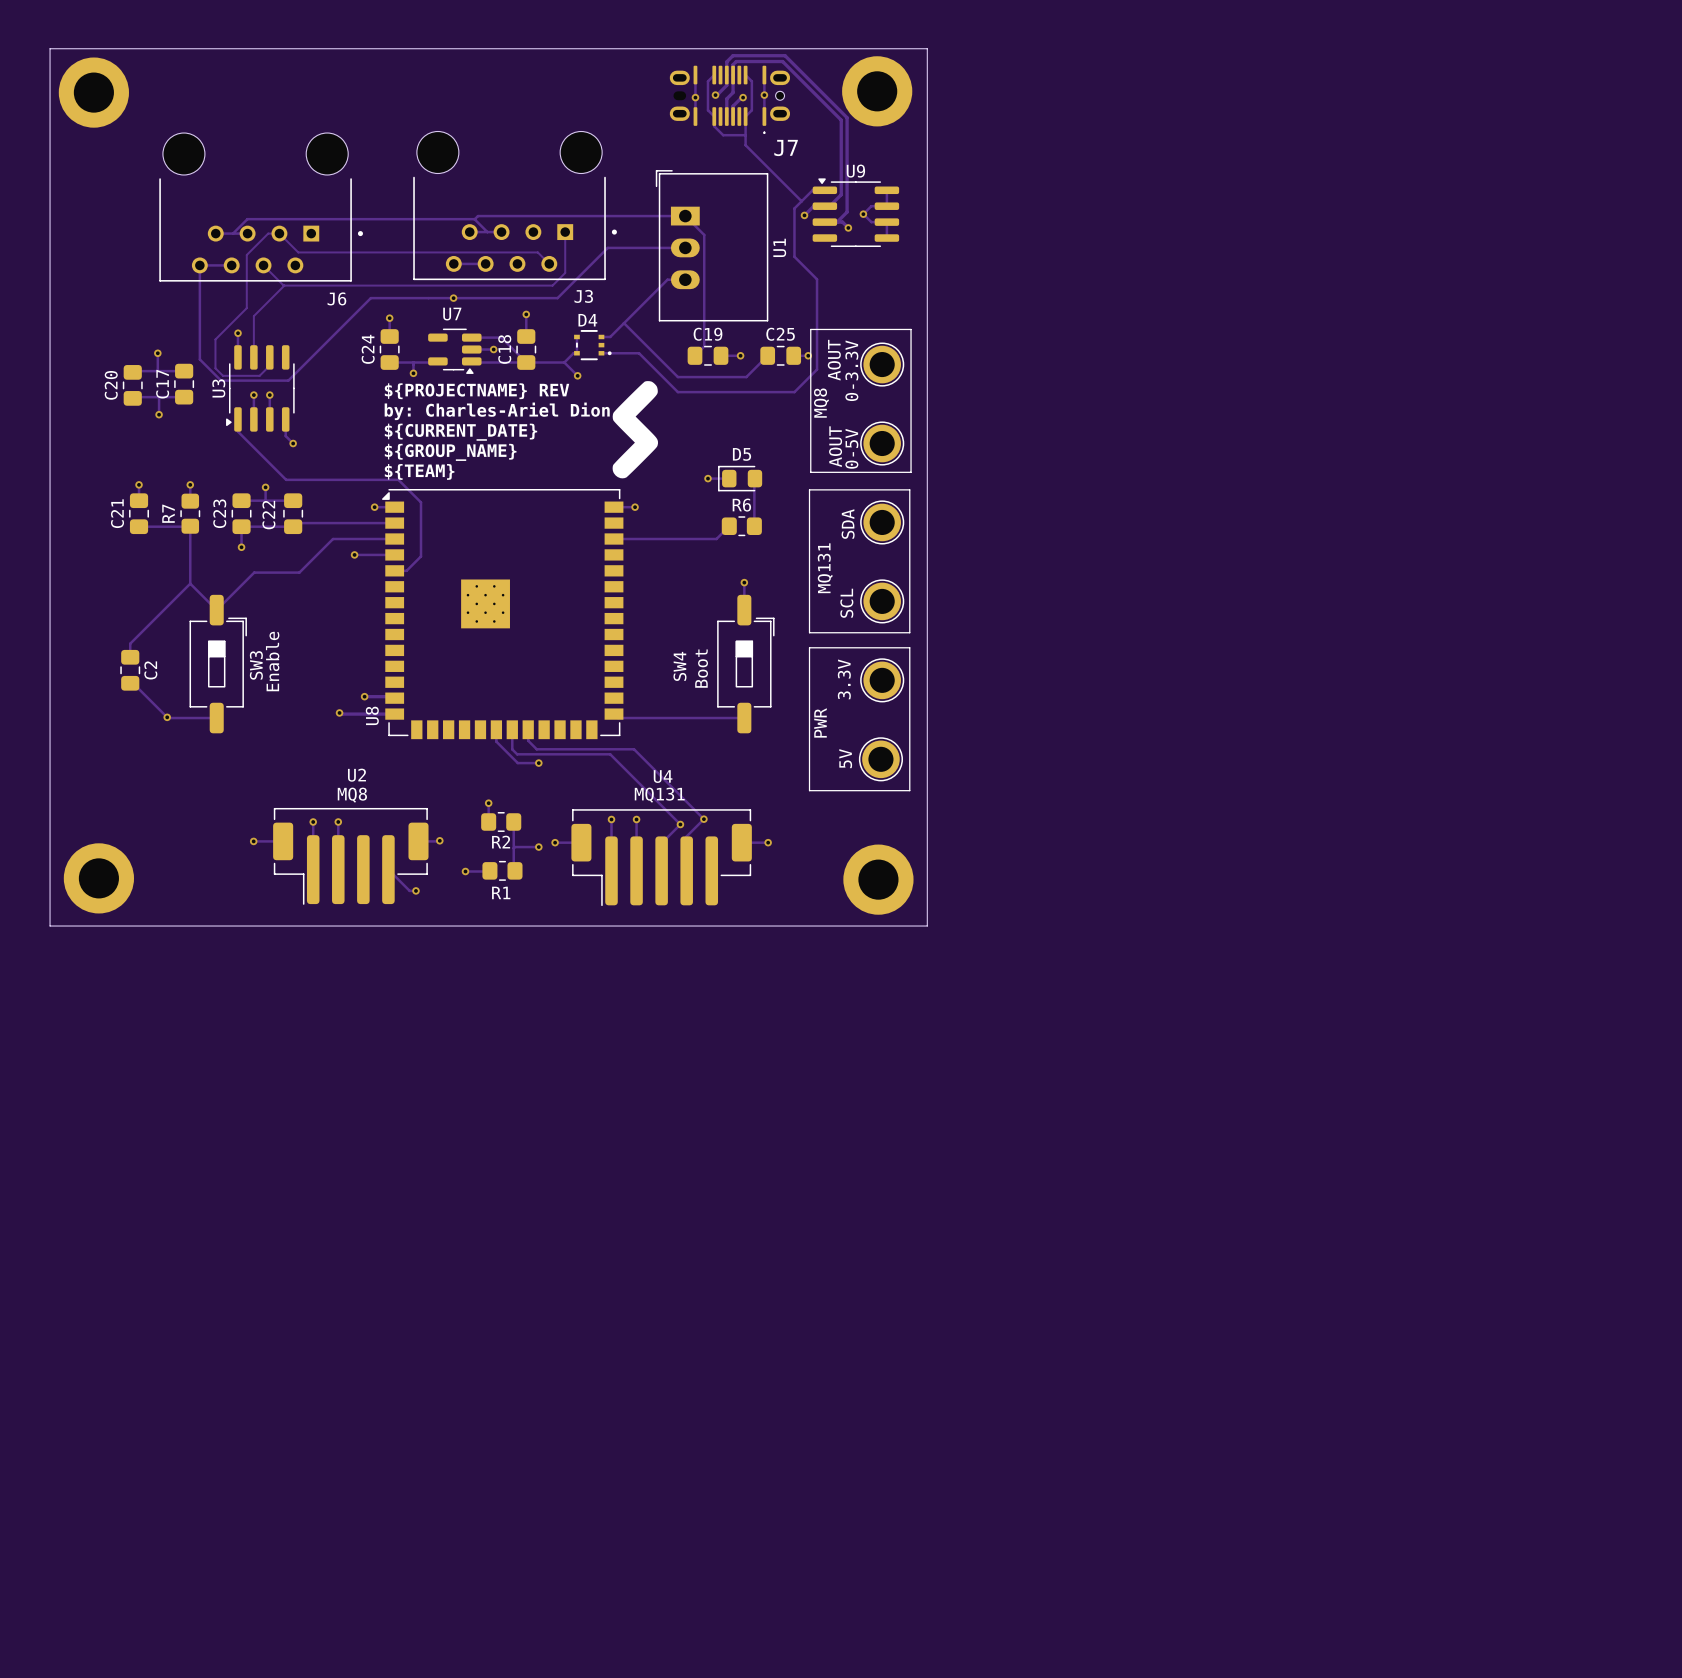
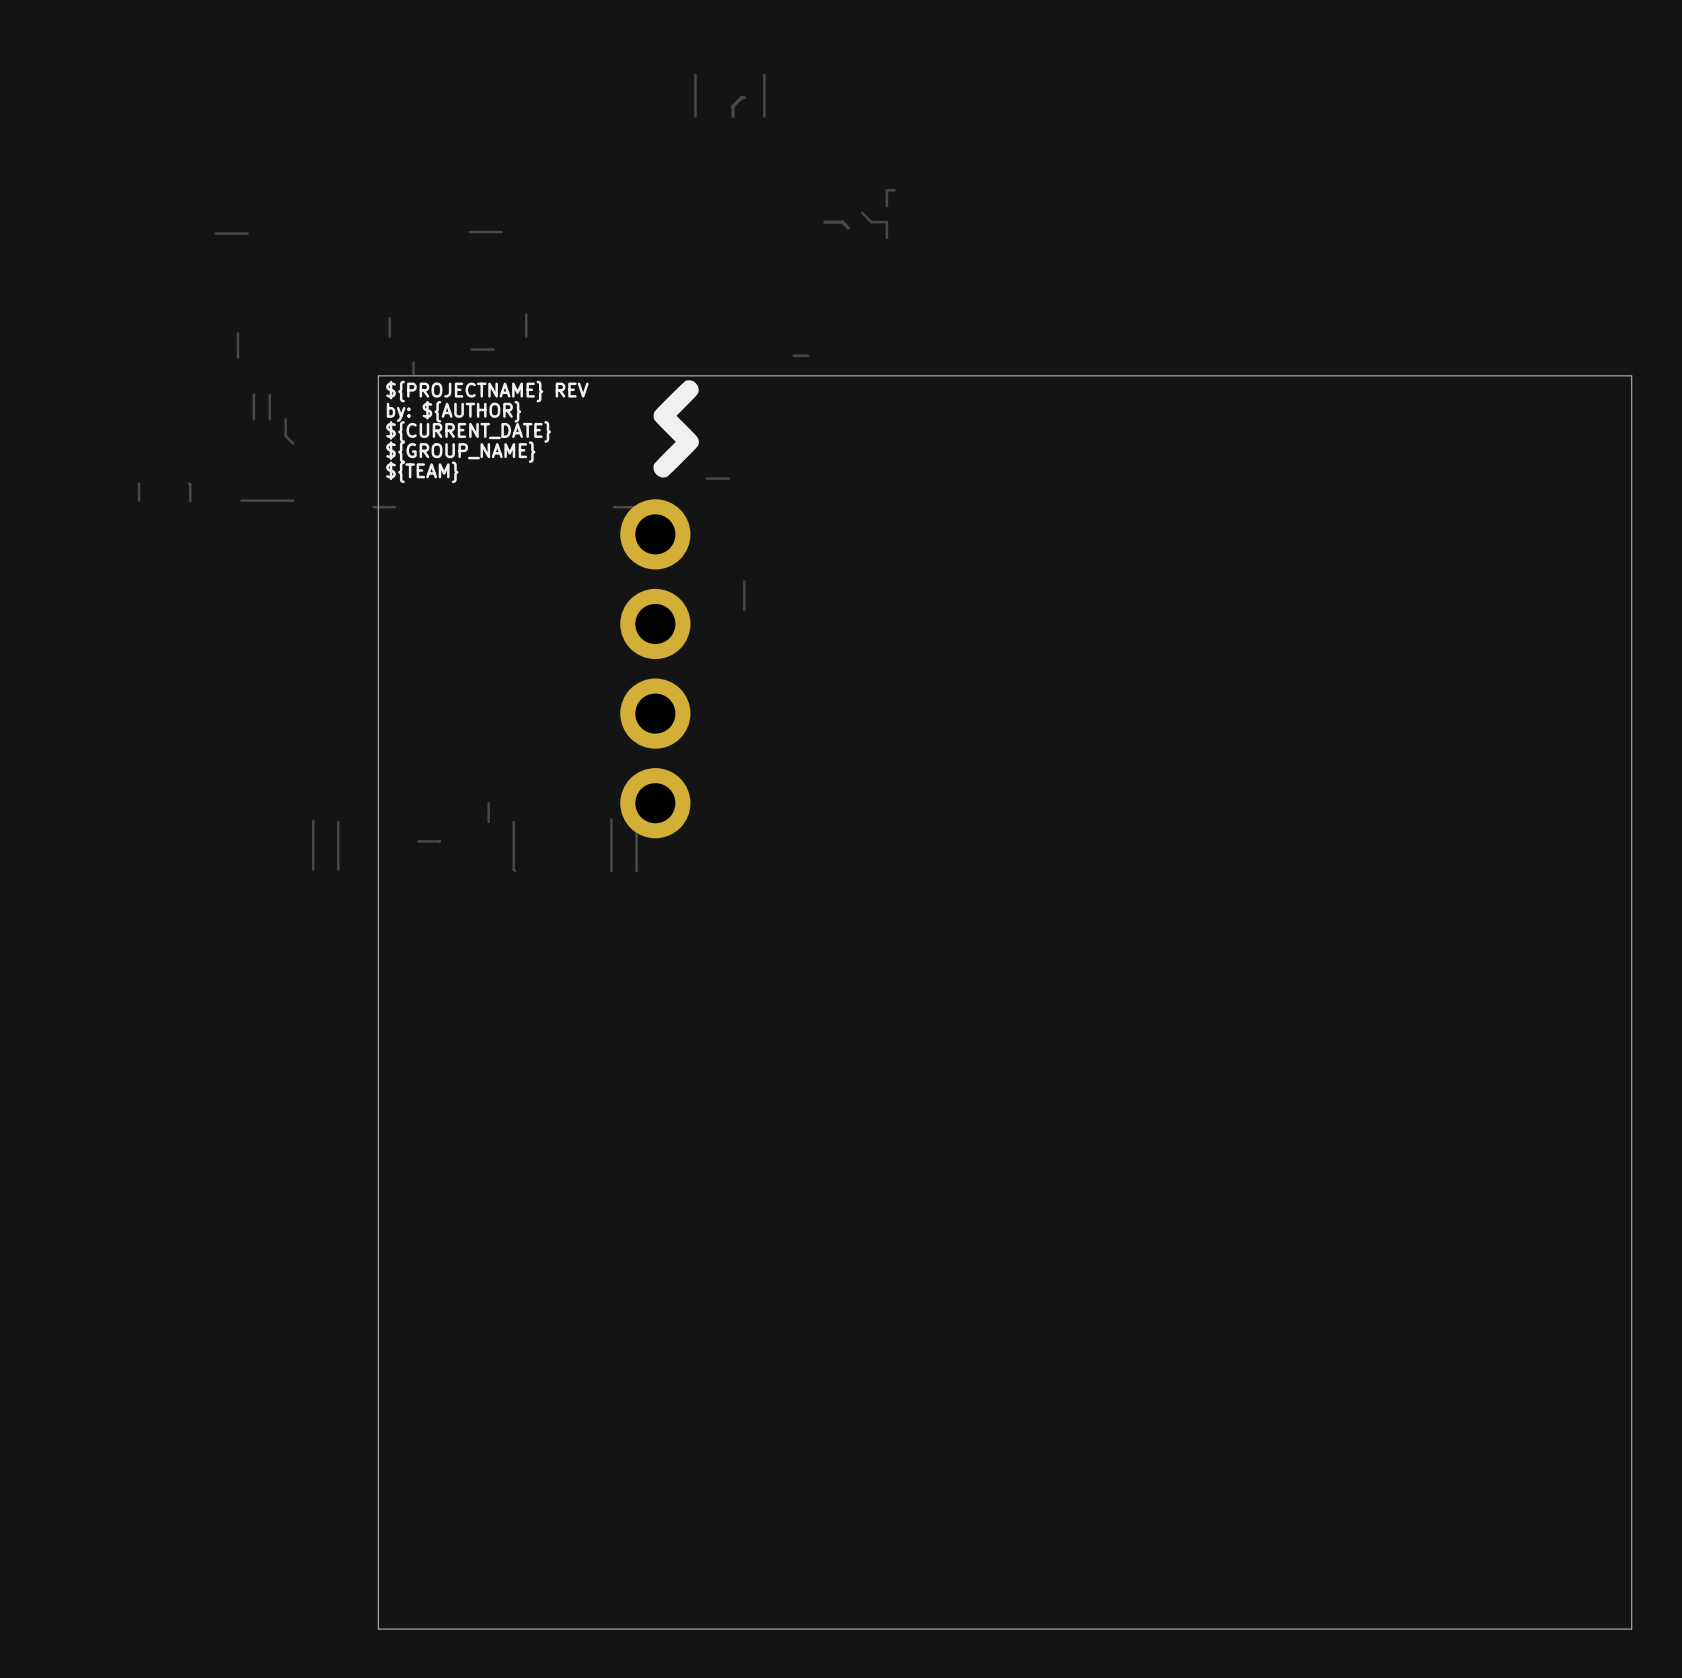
board edge: (50, 48) (927, 48) (927, 926) (50, 926) (50, 48) -> none
track: (714, 75) (707, 81) (707, 110) (714, 116) (714, 126) (723, 135) (745, 135) -> none
track: (745, 75) (751, 81) (751, 110) (745, 116) (745, 145) (801, 201) -> none
part: (877, 91) -> none
part: (93, 92) -> none
track: (715, 95) (726, 85) (726, 61) (732, 55) (785, 55) (847, 117) (847, 212) (837, 222) -> none
via: (715, 95) -> none
via: (764, 95) -> none
via: (695, 97) -> none
via: (743, 97) -> none
J7: (729, 99) -> none
track: (726, 116) (726, 98) (733, 92) (733, 64) (736, 61) (782, 61) (841, 120) (841, 194) (829, 206) (813, 206) (804, 215) -> none
track: (824, 190) (812, 190) (794, 208) (794, 256) (817, 279) (817, 369) (794, 392) (677, 392) (639, 353) (601, 353) -> none
J3: (515, 205) -> none
track: (886, 205) (871, 206) (863, 214) -> none
J6: (261, 207) -> none
U9: (855, 212) -> none
via: (863, 214) -> none
via: (804, 215) -> none
track: (474, 219) (487, 232) -> none
via: (848, 227) -> none
track: (565, 232) (565, 272) (552, 285) (283, 285) (263, 265) -> none
track: (233, 233) (247, 219) (474, 219) (477, 216) (685, 216) (704, 234) (704, 346) (694, 355) -> none
U1: (712, 245) -> none
track: (685, 247) (607, 247) (557, 298) (370, 298) (288, 380) (221, 380) (199, 359) (199, 265) (231, 265) -> none
track: (453, 263) (485, 263) -> none
track: (549, 263) (537, 252) (298, 252) (279, 233) (268, 233) (246, 254) (246, 308) (215, 339) (215, 368) (222, 375) (259, 375) (269, 365) (269, 357) -> none
track: (685, 279) (667, 279) (610, 336) (601, 336) -> none
track: (284, 285) (253, 316) (253, 357) -> none
via: (453, 298) -> none
via: (526, 314) -> none
via: (389, 318) -> none
track: (623, 323) (677, 377) (746, 377) (767, 355) -> none
line: (810, 329) (911, 329) (911, 472) (810, 472) (810, 329) -> none
via: (238, 333) -> none
track: (576, 336) (576, 353) (573, 353) (564, 362) -> none
track: (471, 337) (501, 337) (526, 362) -> none
D4: (592, 345) -> none
C24: (389, 349) -> none
via: (493, 349) -> none
C18: (526, 349) -> none
U7: (454, 351) -> none
track: (156, 352) (157, 371) -> none
via: (157, 353) -> none
C19: (708, 355) -> none
track: (721, 355) (740, 355) -> none
via: (740, 355) -> none
C25: (780, 355) -> none
via: (808, 355) -> none
text: AOUT (834, 360) -> none
track: (437, 361) (389, 362) -> none
track: (471, 361) (564, 362) -> none
track: (564, 362) (577, 375) -> none
part: (882, 364) -> none
text: 0-3.3V (851, 370) -> none
track: (184, 371) (132, 372) -> none
via: (413, 373) -> none
board edge: none -> (378, 375) (1631, 375) (1631, 1629) (378, 1629) (378, 375)
via: (577, 375) -> none
C17: (184, 384) -> none
C20: (132, 385) -> none
U3: (260, 388) -> none
via: (253, 395) -> none
via: (269, 395) -> none
track: (159, 397) (159, 414) -> none
track: (132, 398) (184, 397) (184, 400) -> none
text: MQ8 (821, 403) -> none
text: by: Charles-Ariel Dion (497, 411) -> by: ${AUTHOR} (453, 411)
via: (159, 414) -> none
track: (237, 419) (237, 431) (286, 479) (398, 479) (421, 502) (421, 556) (406, 570) (394, 570) -> none
drawing position: (635, 429) -> (676, 428)
via: (293, 443) -> none
part: (882, 443) -> none
text: AOUT (835, 446) -> none
text: 0-5V (851, 448) -> none
via: (708, 478) -> none
D5: (740, 478) -> none
track: (754, 478) (754, 526) -> none
via: (139, 484) -> none
via: (190, 484) -> none
track: (266, 486) (265, 500) -> none
via: (265, 487) -> none
line: (809, 489) (809, 632) (909, 632) (909, 489) (809, 489) -> none
via: (374, 507) -> none
via: (635, 507) -> none
C21: (139, 513) -> none
R7: (190, 513) -> none
C23: (241, 513) -> none
C22: (293, 513) -> none
part: (882, 522) -> none
text: SDA (848, 524) -> none
track: (139, 526) (190, 526) (190, 583) -> none
track: (391, 526) (394, 523) (296, 523) (293, 526) (241, 526) (241, 547) -> none
track: (729, 526) (716, 539) (614, 539) -> none
R6: (741, 526) -> none
part: none -> (655, 534)
track: (394, 539) (333, 539) (299, 572) (254, 572) (216, 610) (190, 583) -> none
via: (241, 547) -> none
track: (354, 554) (394, 554) -> none
via: (354, 554) -> none
text: MQ131 (825, 568) -> none
via: (744, 582) -> none
track: (190, 583) (130, 643) (130, 657) -> none
part: (882, 601) -> none
text: SCL (846, 603) -> none
U8: (502, 614) -> none
part: none -> (655, 623)
line: (809, 647) (809, 790) (909, 790) (909, 647) (809, 647) -> none
text: Enable (272, 661) -> none
SW3: (218, 664) -> none
SW4: (745, 664) -> none
text: Boot (701, 668) -> none
C2: (130, 670) -> none
text: 3.3V (844, 679) -> none
part: (882, 680) -> none
track: (130, 683) (133, 683) (167, 718) (216, 718) -> none
track: (364, 696) (394, 698) -> none
via: (364, 696) -> none
track: (339, 712) (394, 714) -> none
via: (339, 712) -> none
part: none -> (655, 713)
track: (614, 714) (617, 718) (744, 718) -> none
via: (167, 717) -> none
text: PWR (820, 722) -> none
track: (496, 729) (496, 741) (517, 763) (538, 763) -> none
track: (512, 729) (512, 749) (517, 754) (610, 754) (680, 824) (661, 843) (661, 870) -> none
track: (528, 729) (528, 740) (536, 749) (634, 749) (703, 819) (686, 836) (686, 870) -> none
text: 5V (845, 758) -> none
part: (880, 759) -> none
via: (538, 763) -> none
text: MQ8 (352, 795) -> none
text: MQ131 (659, 795) -> none
via: (488, 803) -> none
part: none -> (655, 803)
via: (611, 819) -> none
via: (636, 819) -> none
via: (703, 819) -> none
via: (313, 821) -> none
via: (338, 821) -> none
R2: (501, 821) -> none
via: (680, 824) -> none
track: (251, 839) (253, 841) (283, 841) -> none
via: (439, 840) -> none
via: (253, 841) -> none
track: (553, 842) (581, 842) -> none
via: (555, 842) -> none
via: (768, 842) -> none
track: (769, 842) (741, 842) -> none
track: (538, 847) (513, 848) -> none
via: (538, 847) -> none
U2: (350, 856) -> none
U4: (661, 857) -> none
track: (388, 869) (409, 890) (415, 890) -> none
track: (489, 870) (465, 871) -> none
R1: (502, 870) -> none
via: (465, 871) -> none
part: (98, 878) -> none
part: (878, 879) -> none
via: (415, 890) -> none

